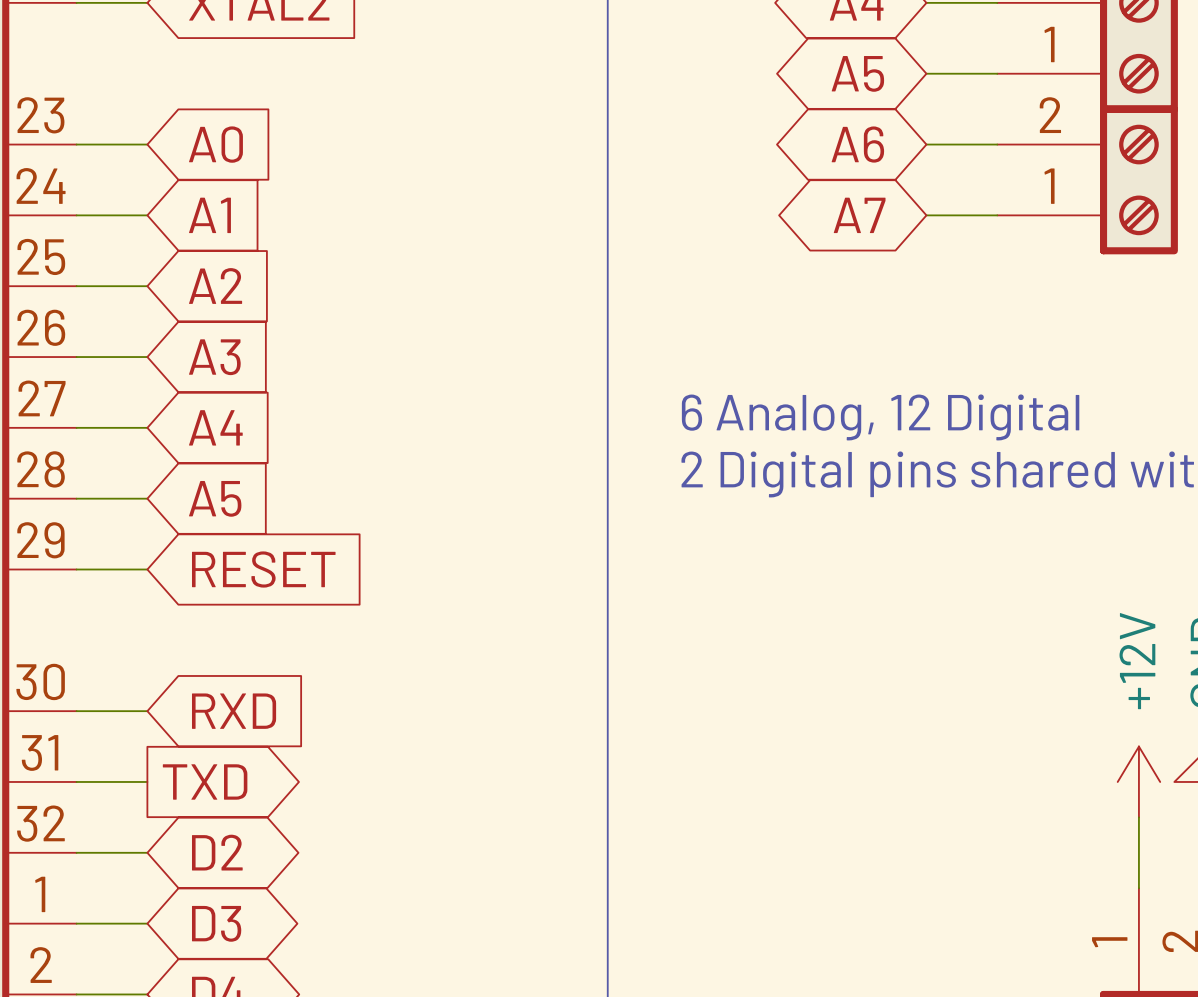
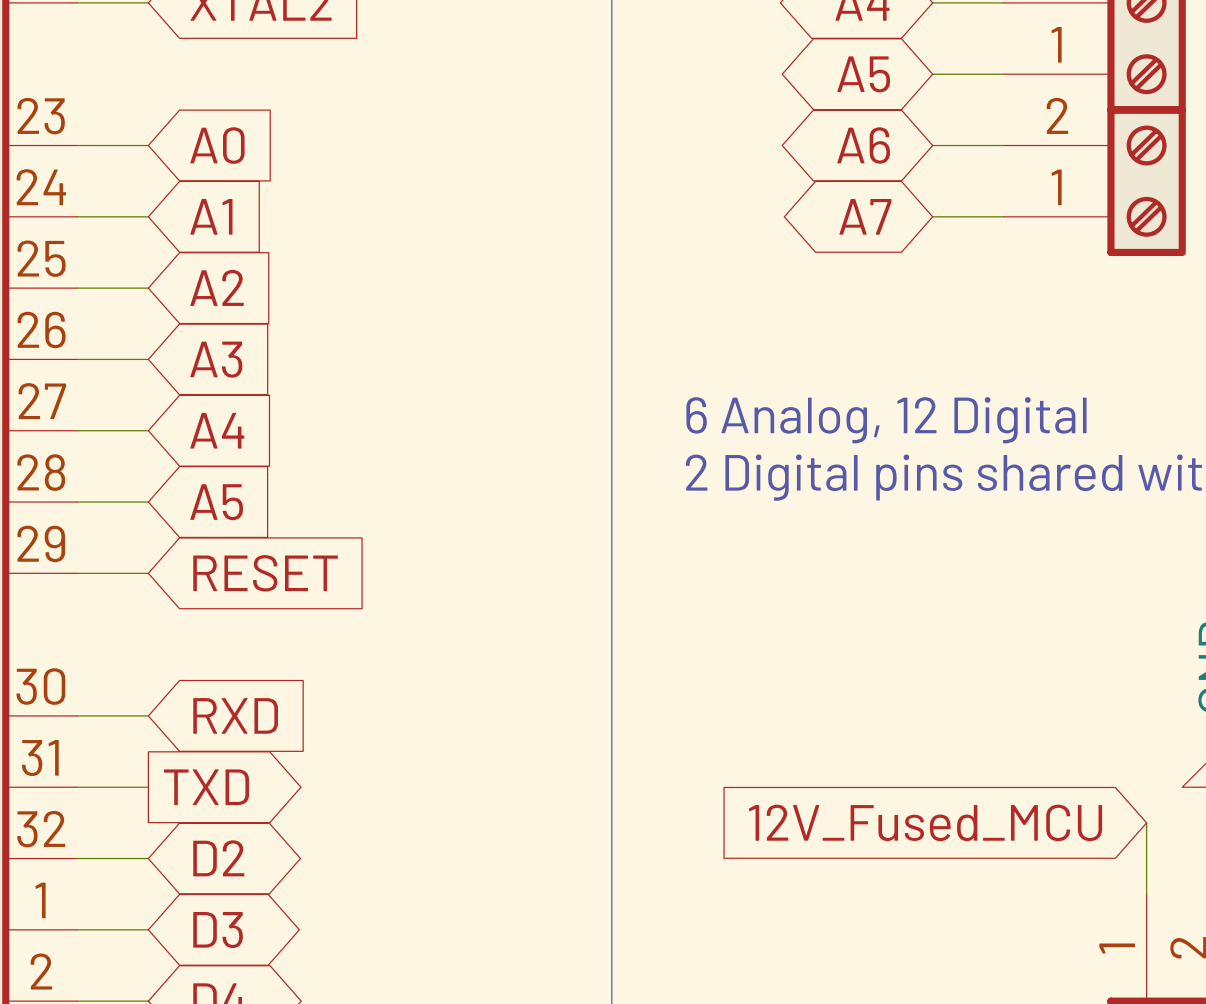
power symbol: +12V (1138, 781) -> none
global label: none -> 12V_Fused_MCU (925, 822)

